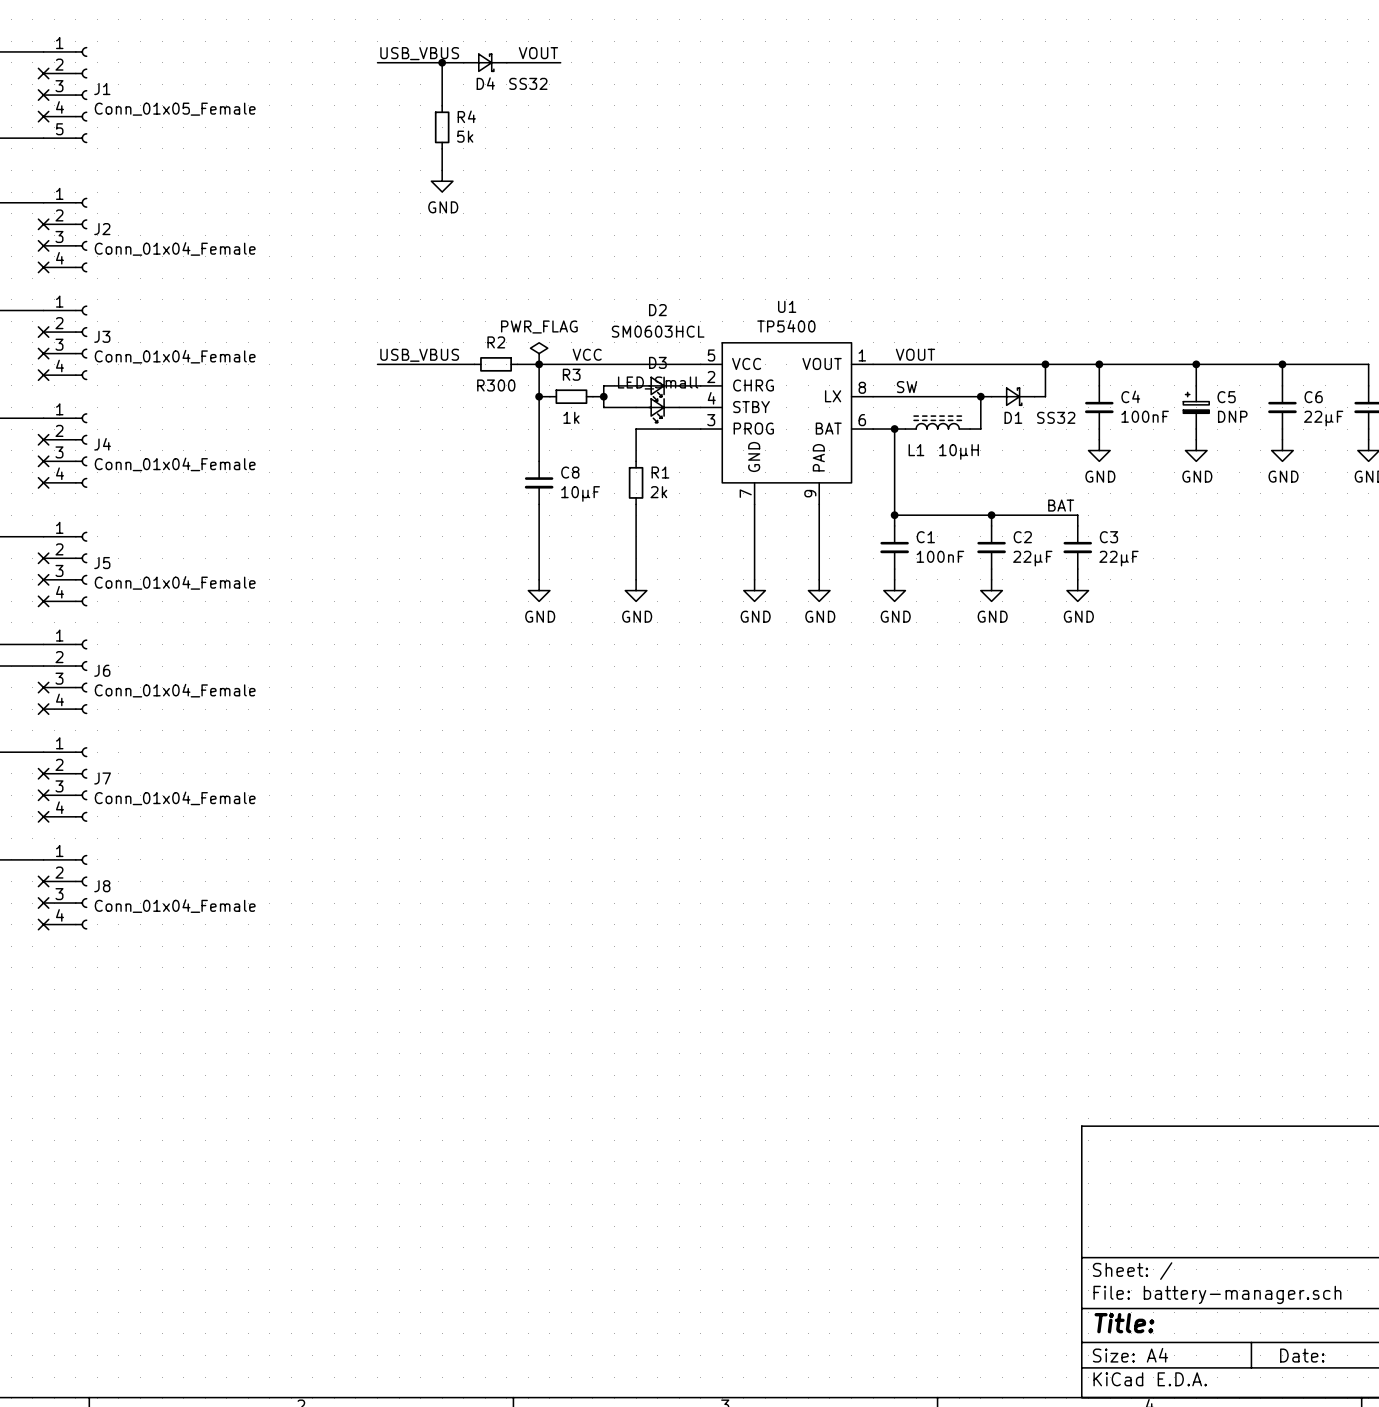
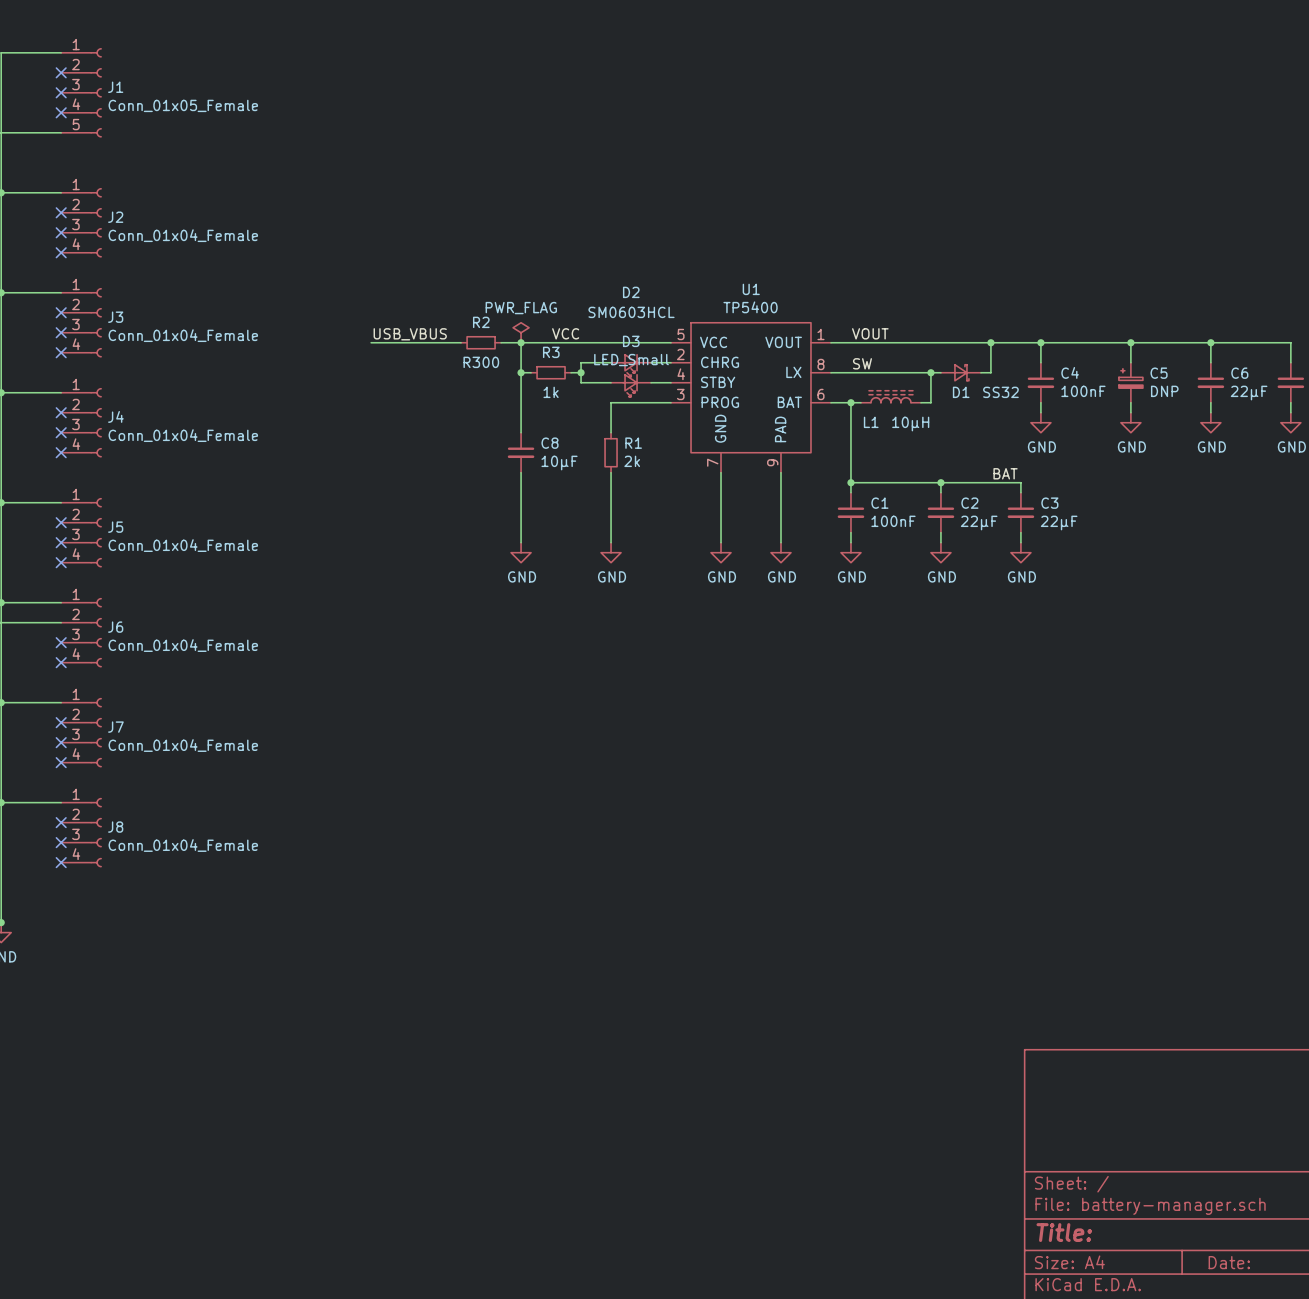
label: USB_VBUS (419, 53) -> none
label: VOUT (538, 53) -> none
wire: (377, 62) (463, 62) -> none
wire: (442, 62) (442, 105) -> none
junction: (442, 62) -> none
D4: SS32 (485, 62) -> none
wire: (506, 62) (560, 62) -> none
R4: 5k (442, 127) -> none
wire: (442, 148) (442, 170) -> none
power symbol: GND (442, 181) -> none

